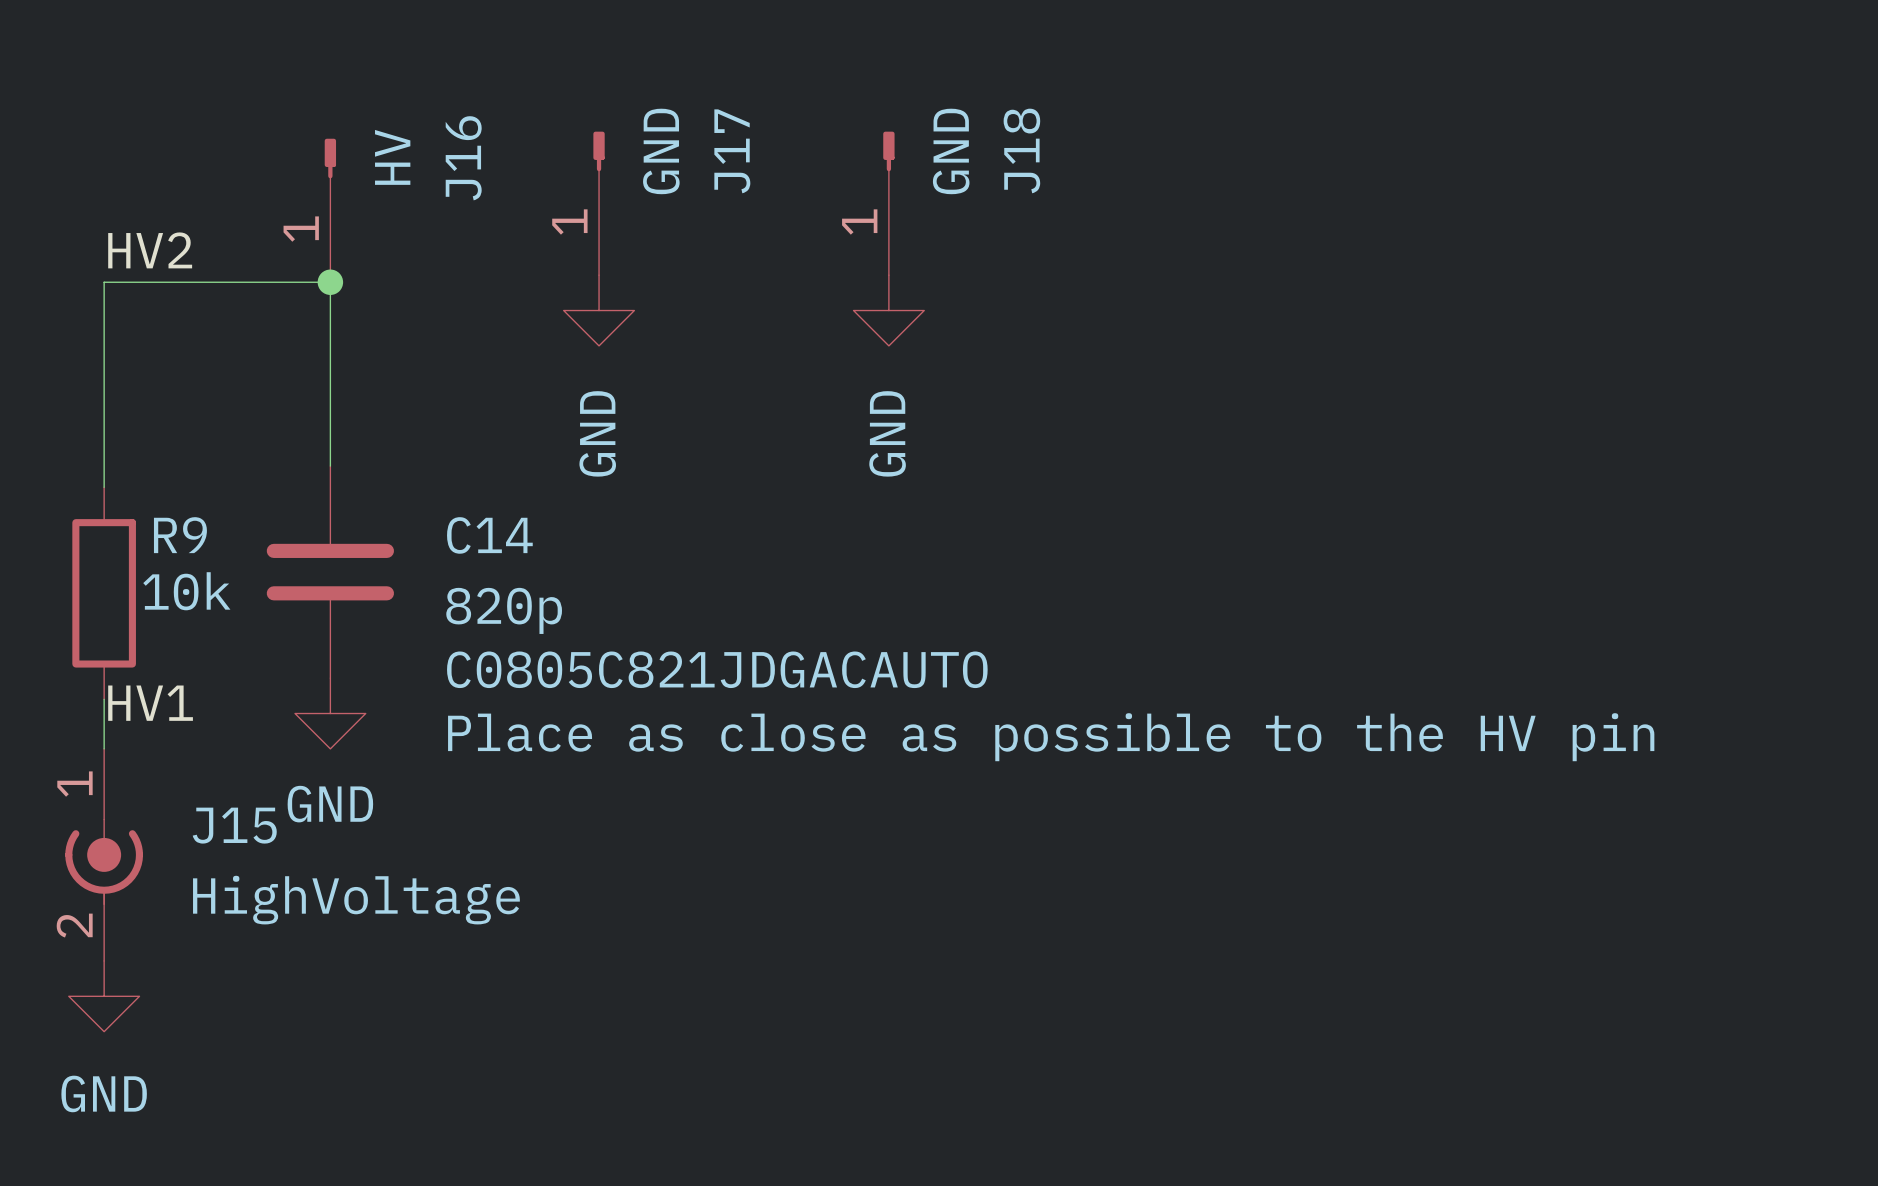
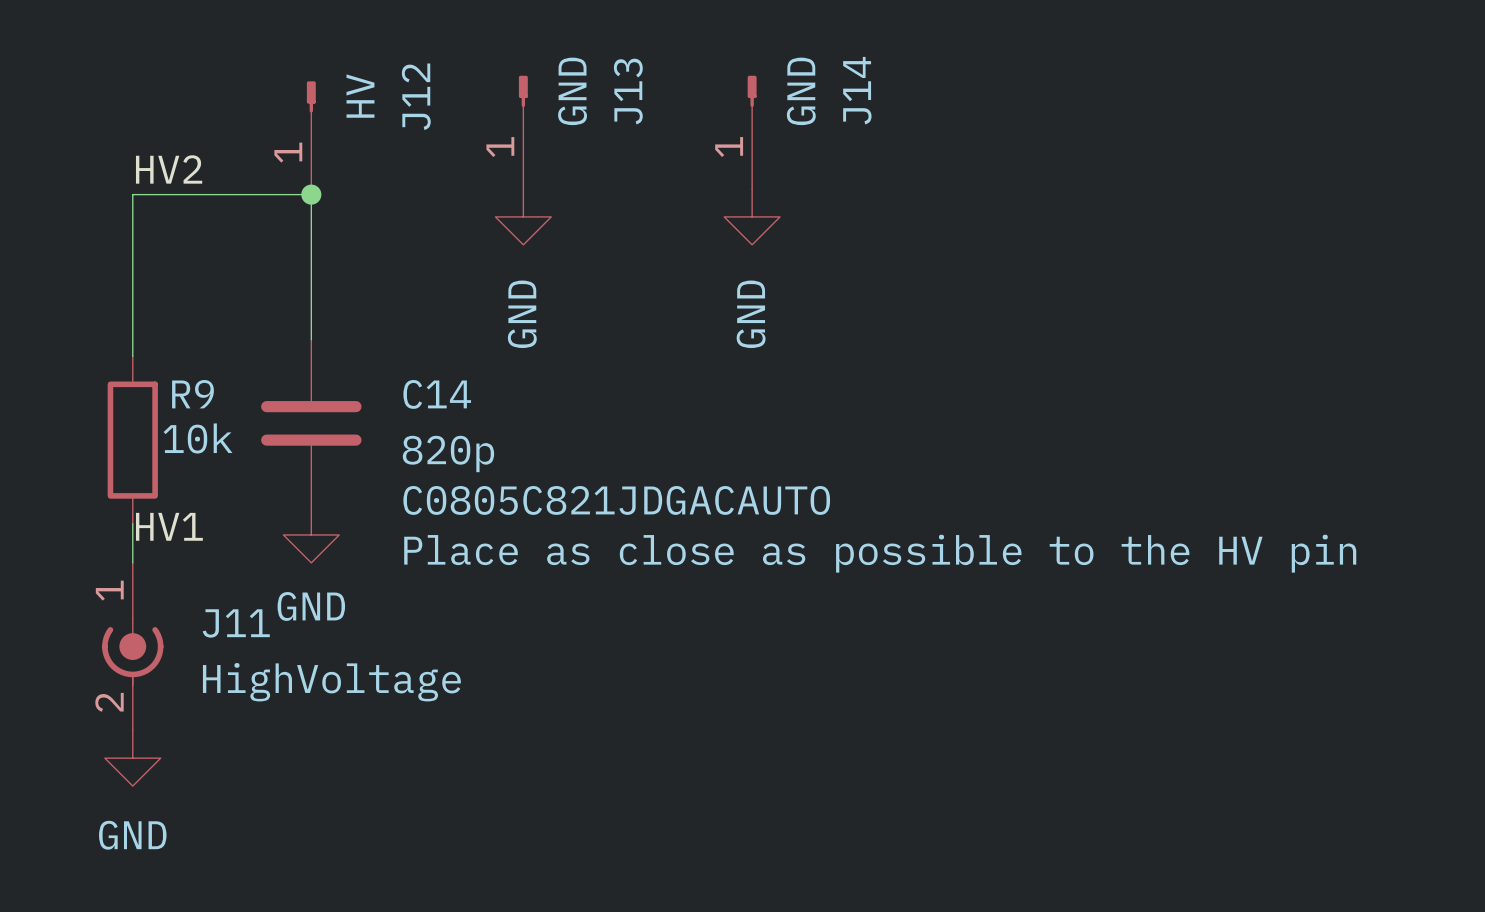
J18 name: J18 (1021, 150) -> J14 (857, 90)
J17 name: J17 (732, 151) -> J13 (628, 91)
J16 name: J16 (463, 158) -> J12 (416, 96)
J15 name: J15 (234, 825) -> J11 (236, 623)

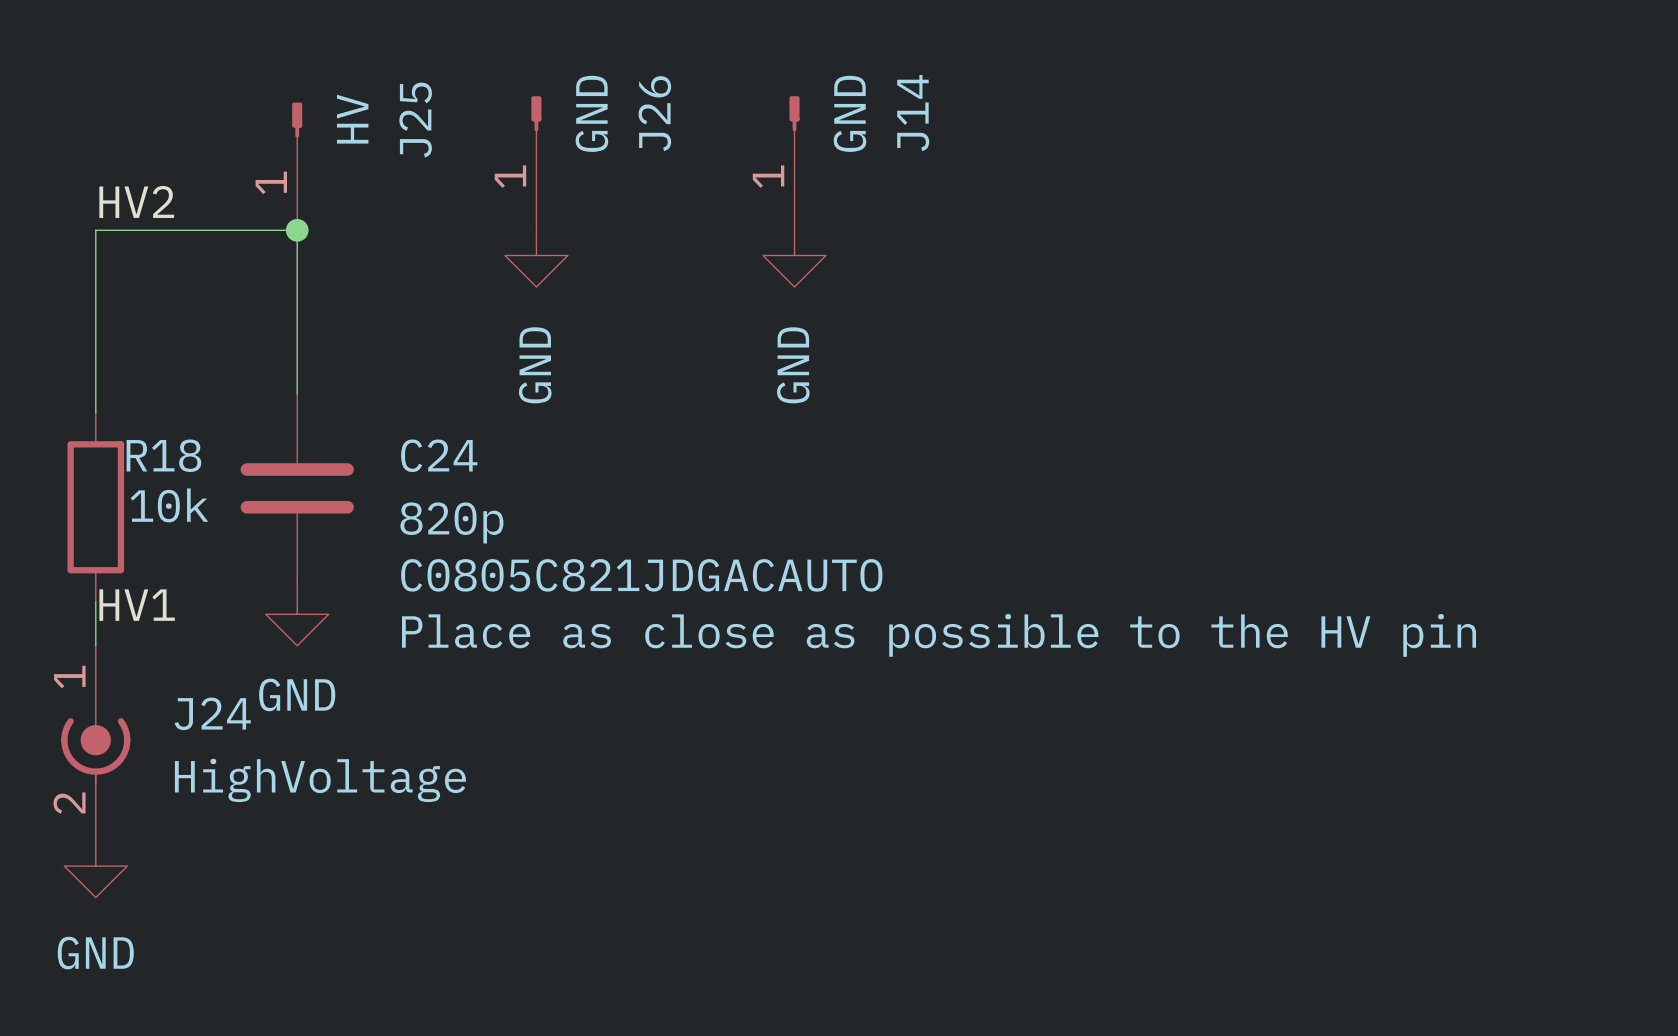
J13 name: J13 (628, 91) -> J26 (654, 113)
J12 name: J12 (416, 96) -> J25 (415, 119)
R9 name: R9 (192, 394) -> R18 (163, 455)
C14 name: C14 (437, 394) -> C24 (439, 455)
J11 name: J11 (236, 623) -> J24 (212, 713)

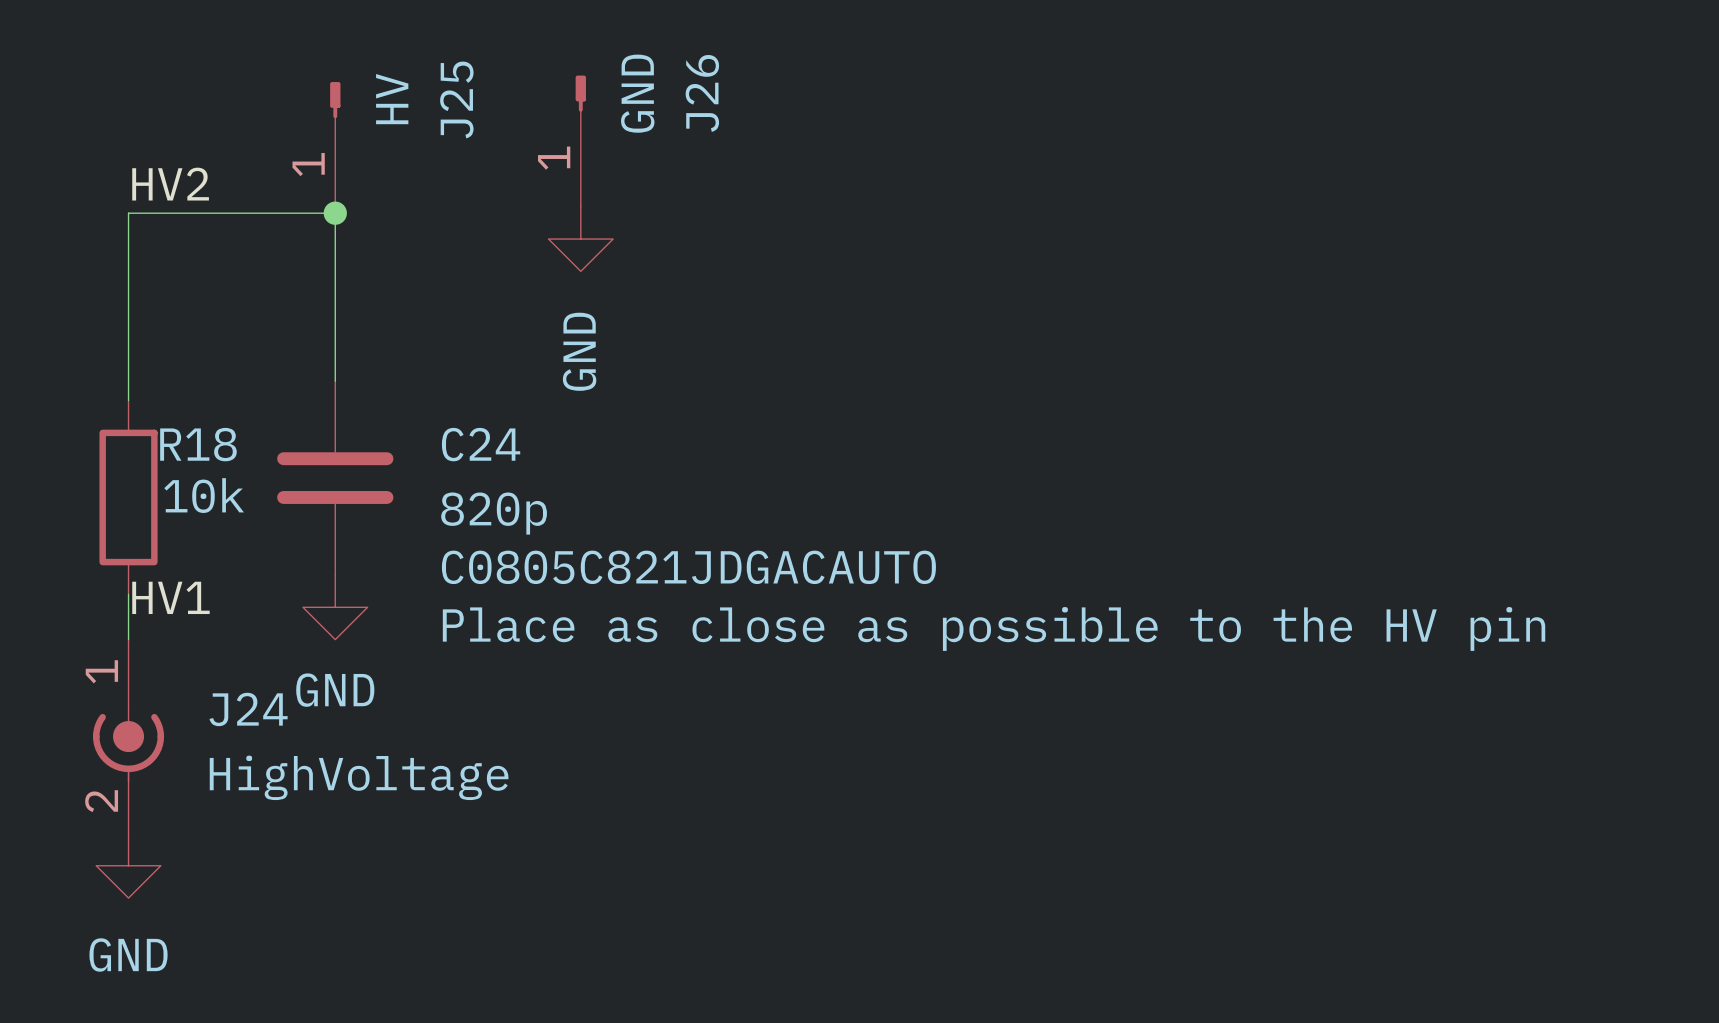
J14: GND (794, 160) -> none
power symbol: GND (794, 255) -> none

